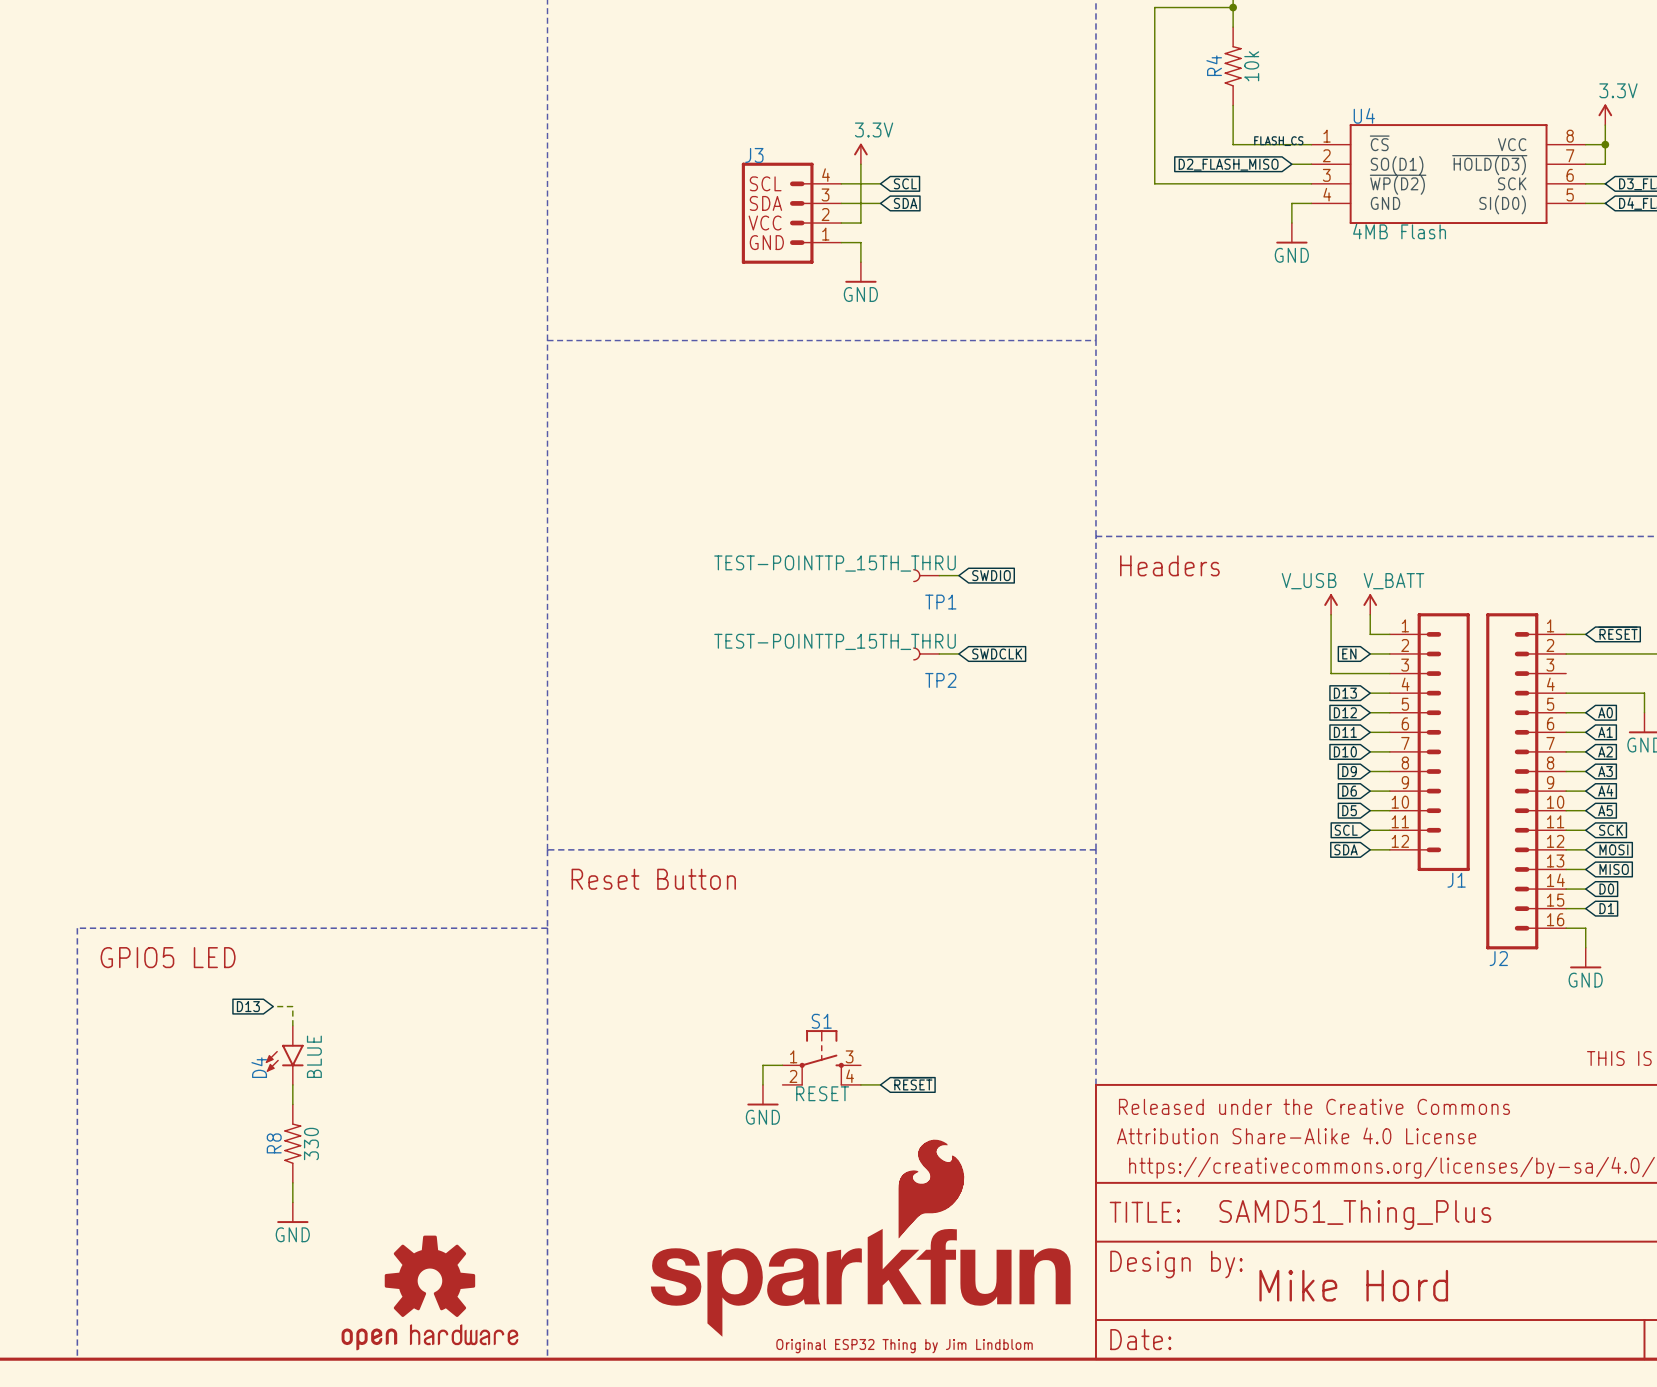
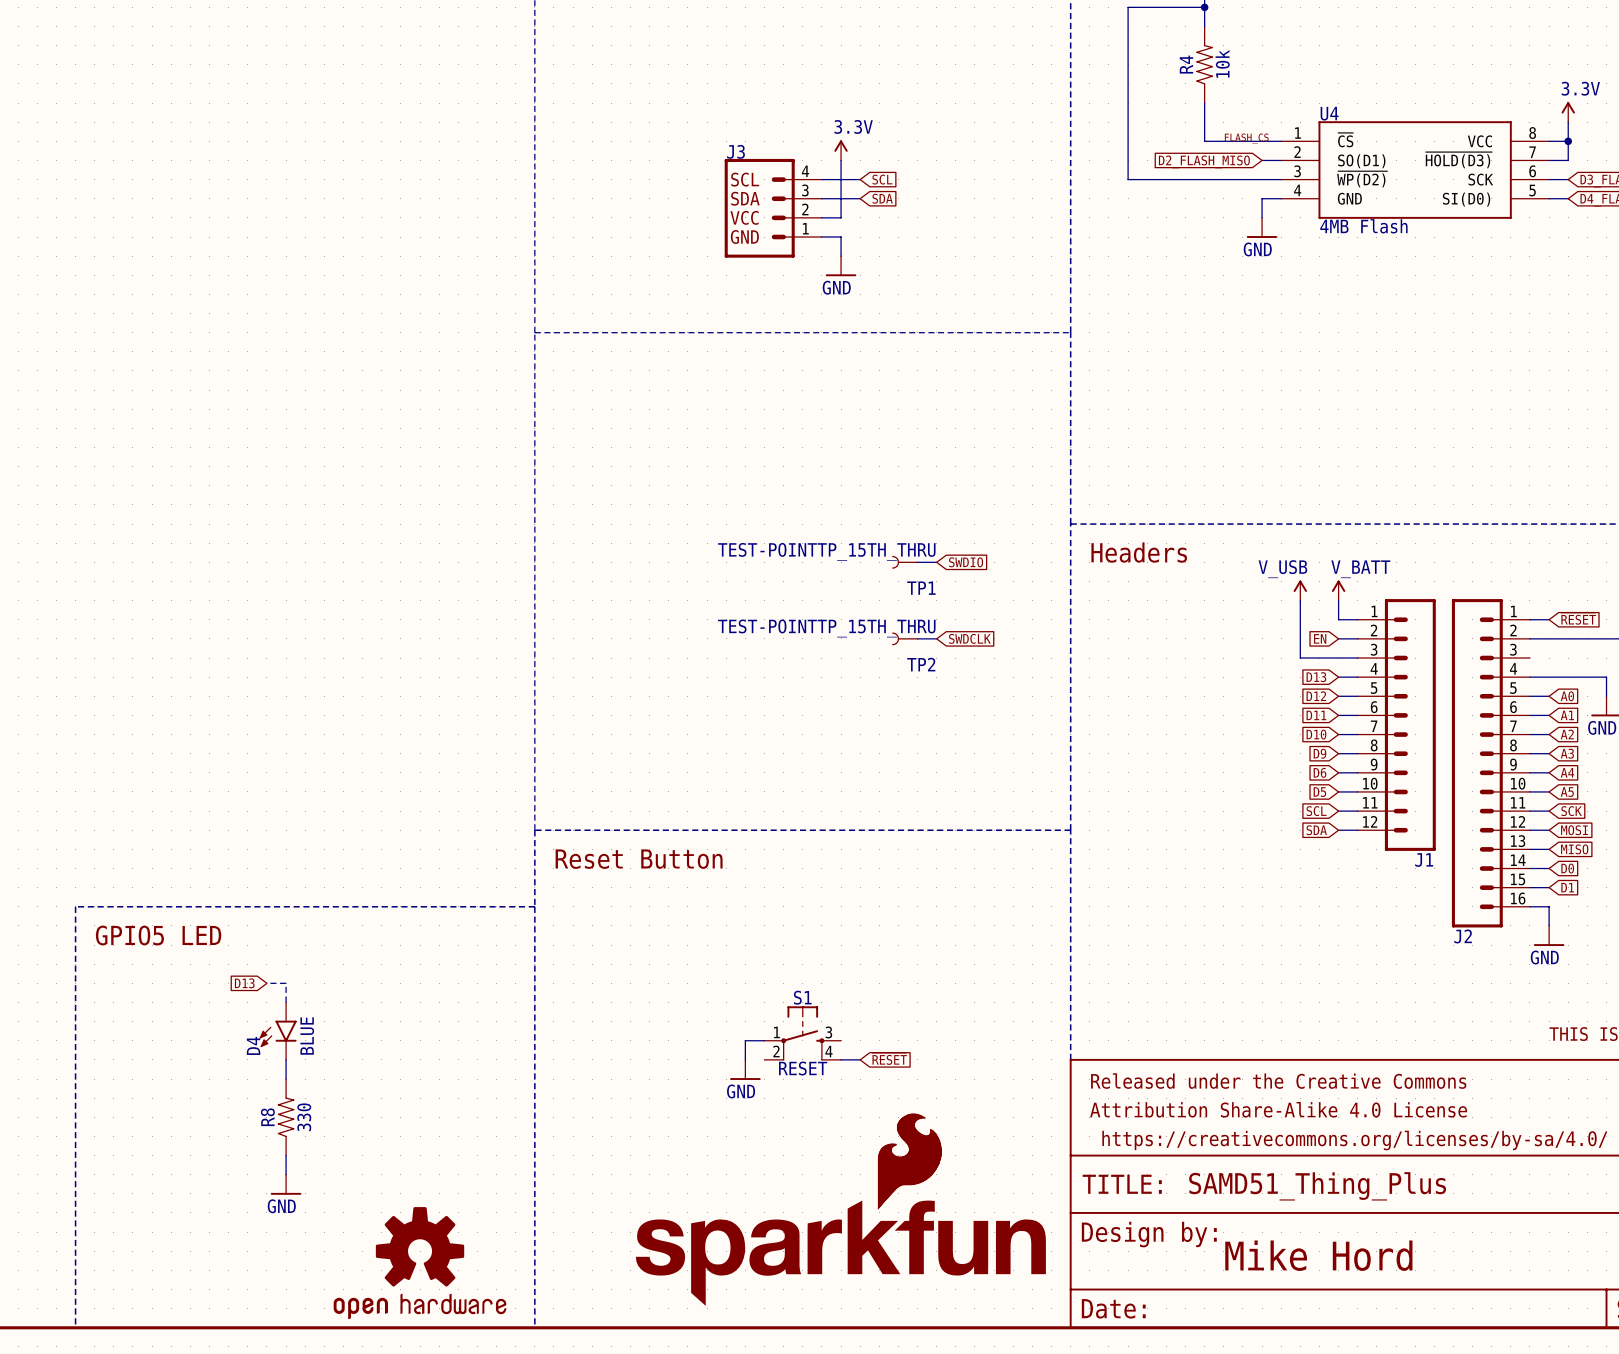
text: Original ESP32 Thing by Jim Lindblom (904, 1346) -> none

